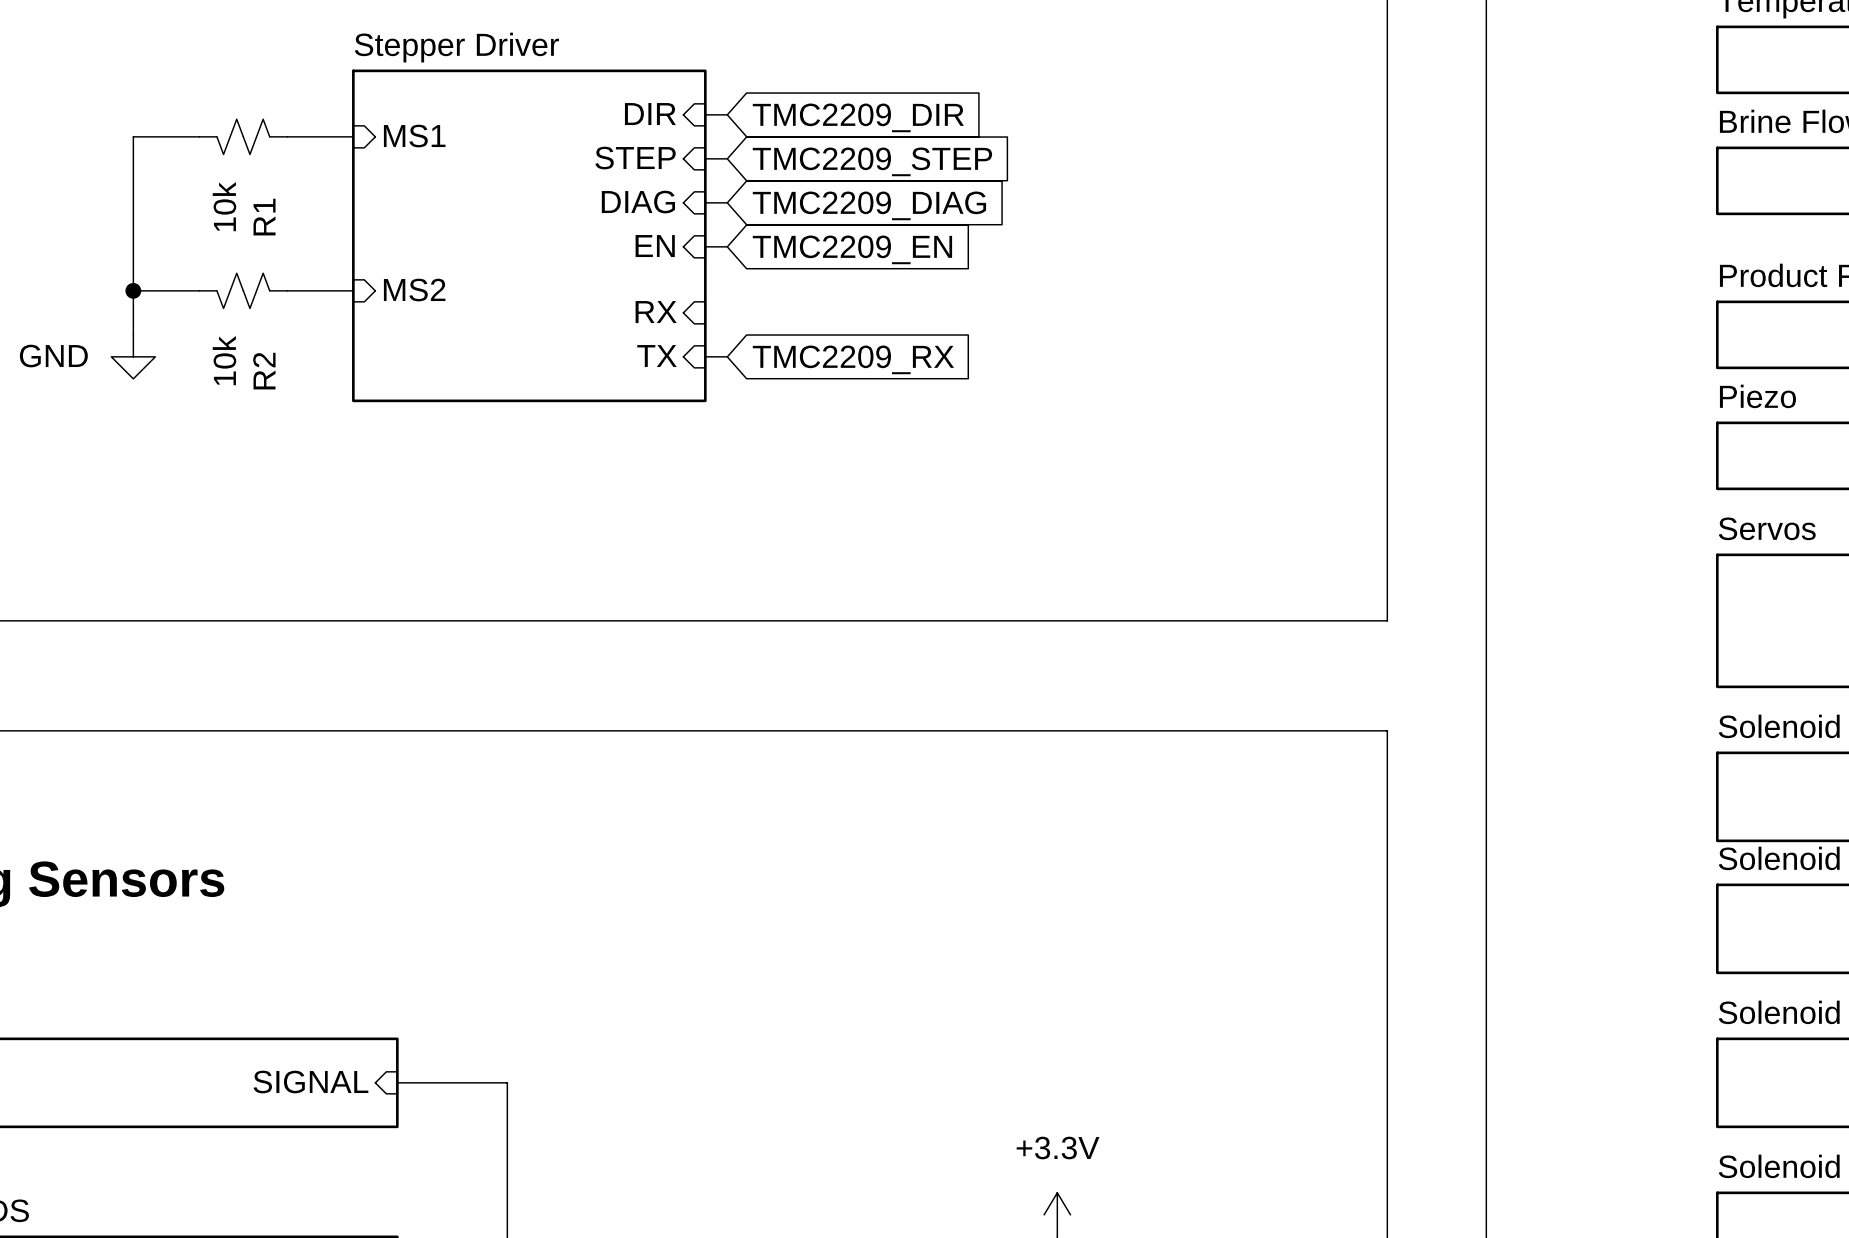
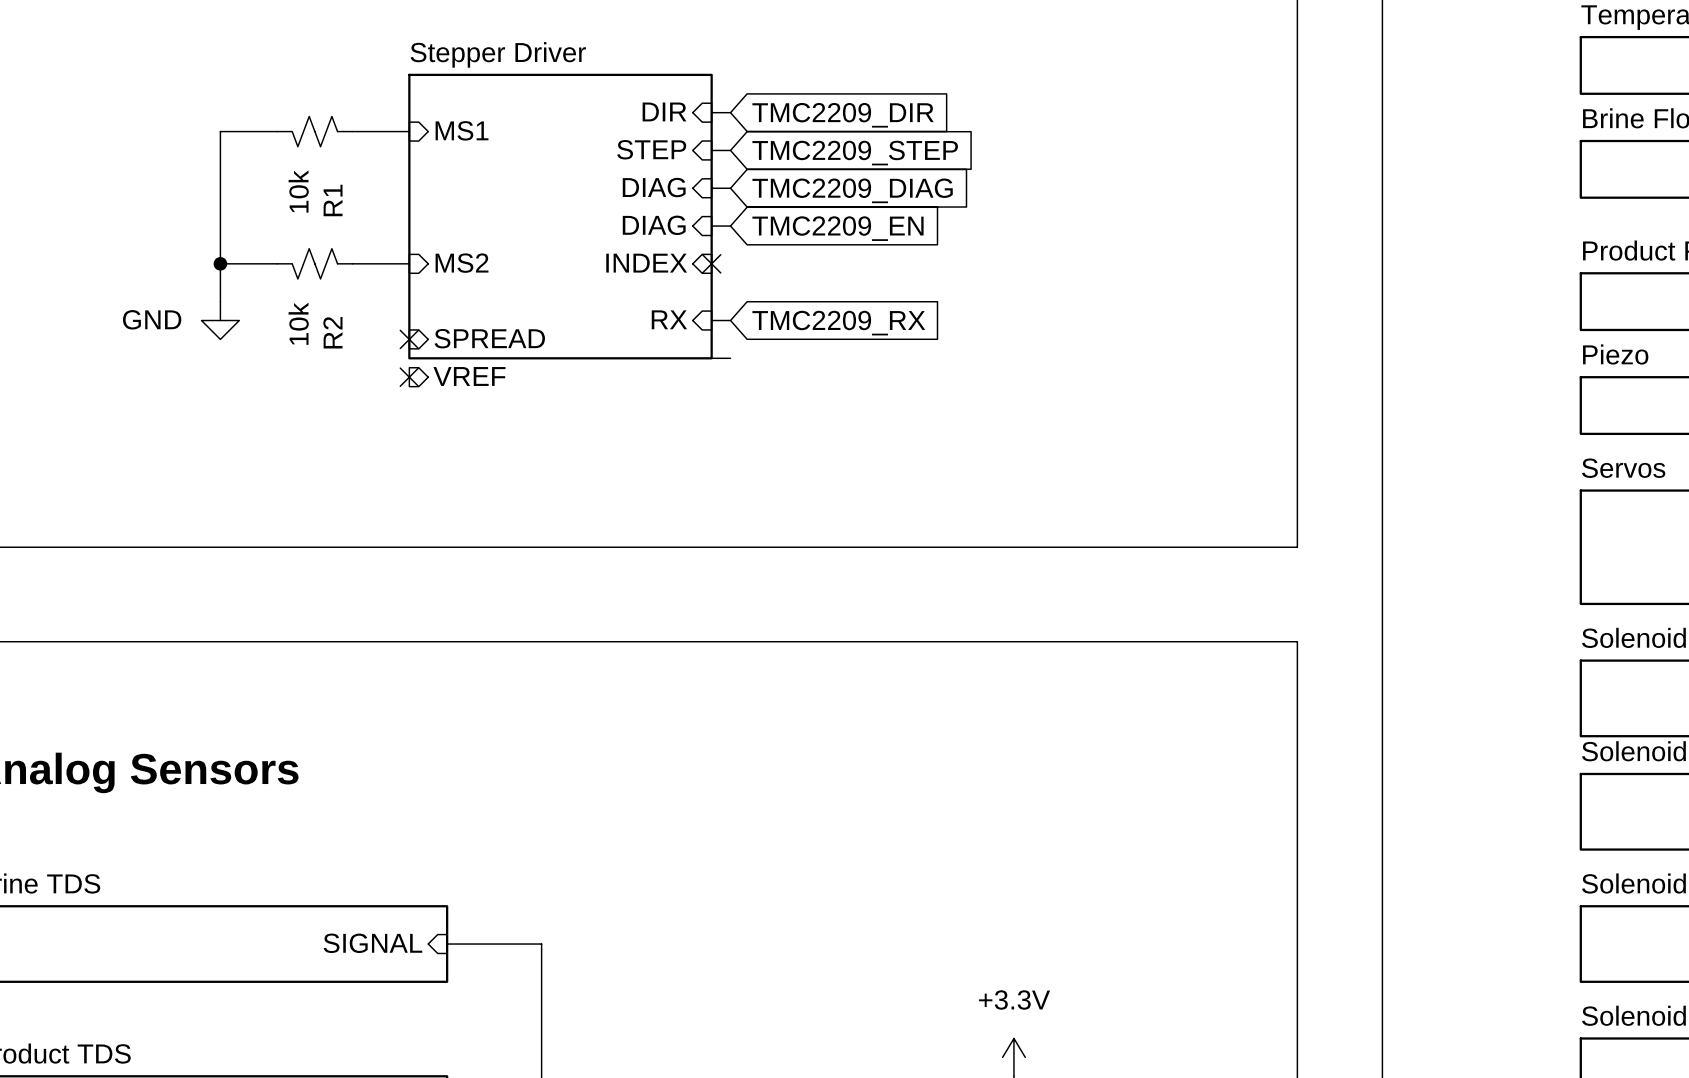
sheet pin: EN (655, 246) -> DIAG (654, 225)
sheet pin: none -> INDEX (646, 263)
no-connect mark: none -> (711, 263)
sheet pin: RX (656, 312) -> none
sheet pin: TX (656, 356) -> RX (669, 319)
no-connect mark: none -> (409, 339)
sheet pin: none -> SPREAD (489, 338)
wire: none -> (711, 358) (730, 358)
no-connect mark: none -> (409, 377)
sheet pin: none -> VREF (469, 376)

